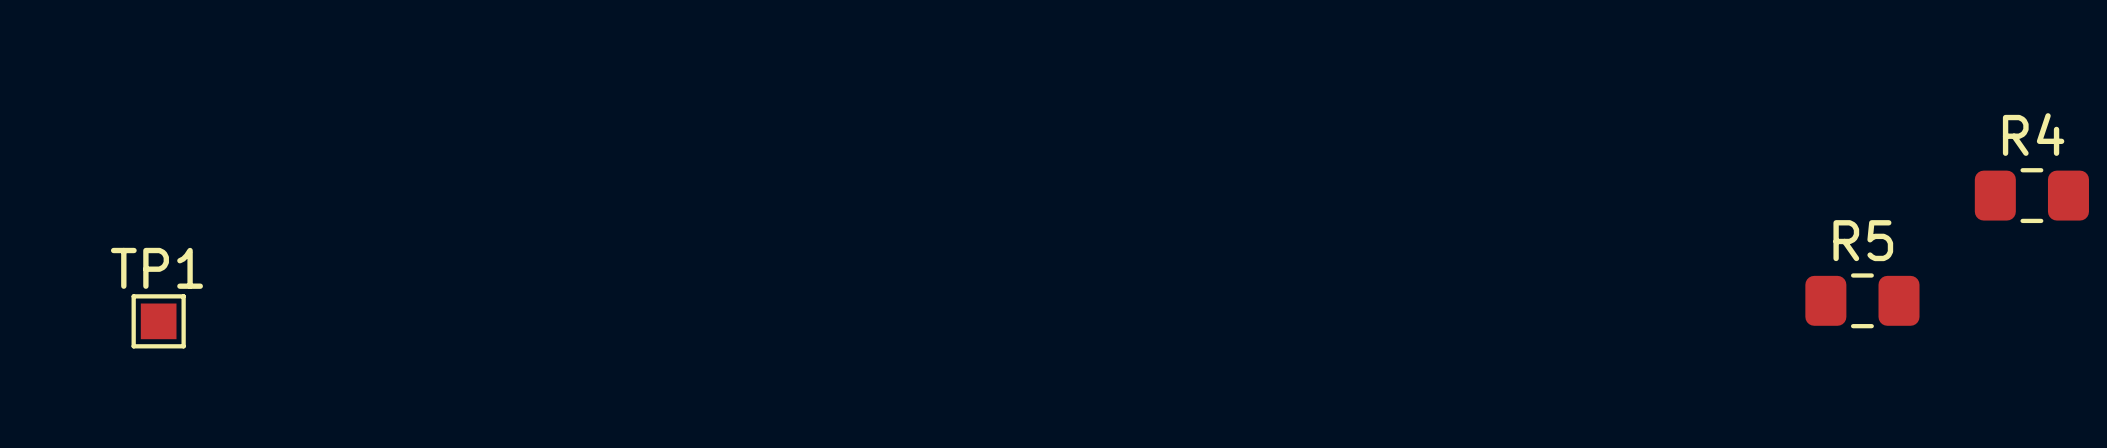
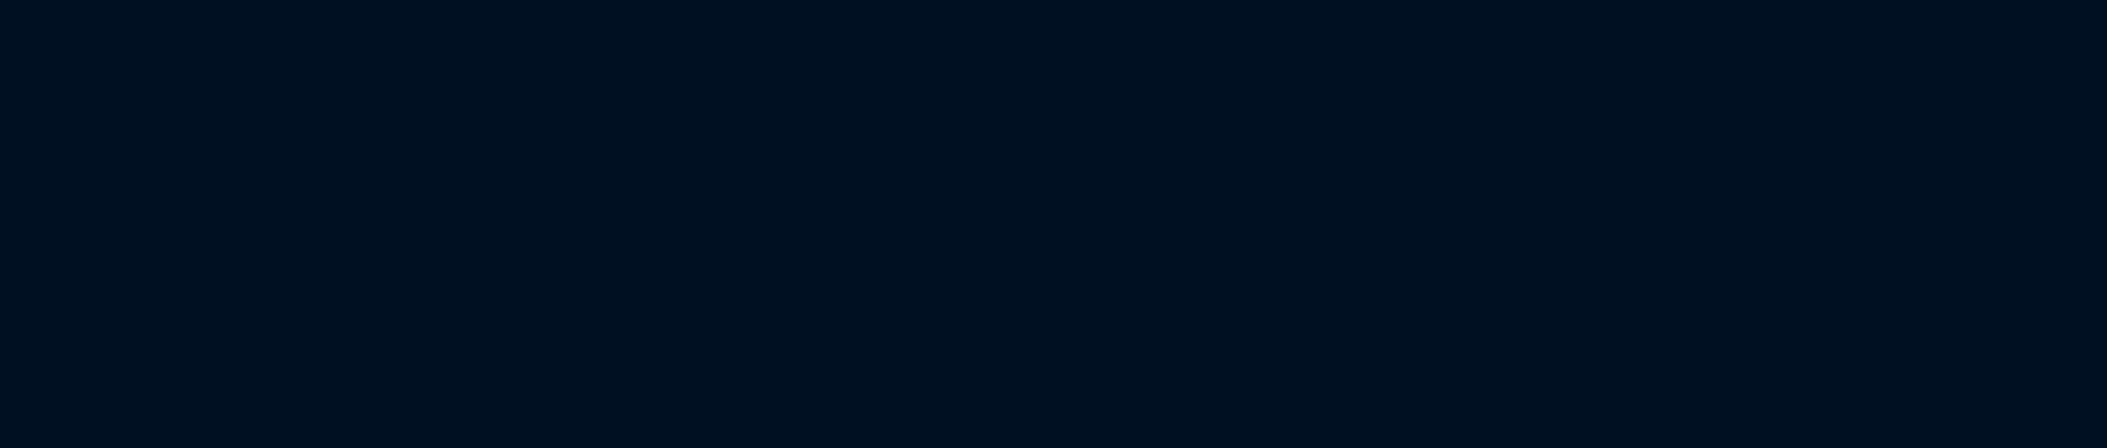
R4: (2031, 195) -> none
R5: (1862, 300) -> none
TP1: (158, 321) -> none

